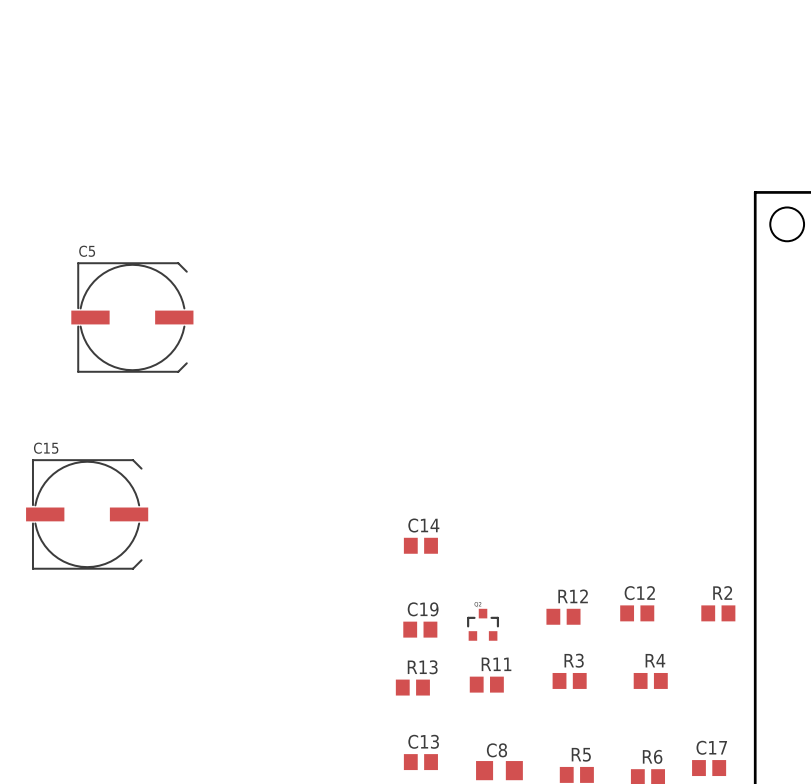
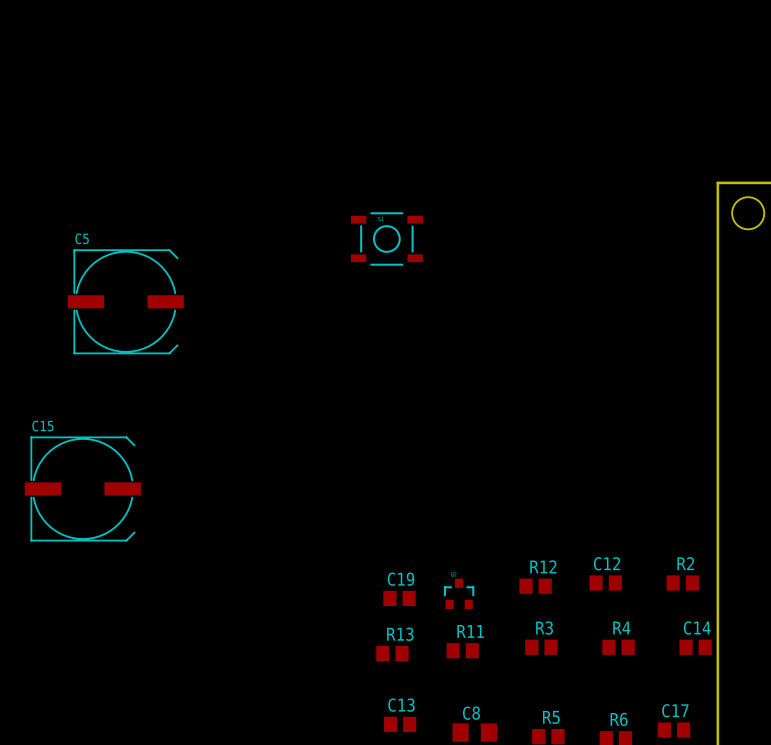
part: none -> (386, 239)
C14 position: (420, 545) -> (695, 647)

